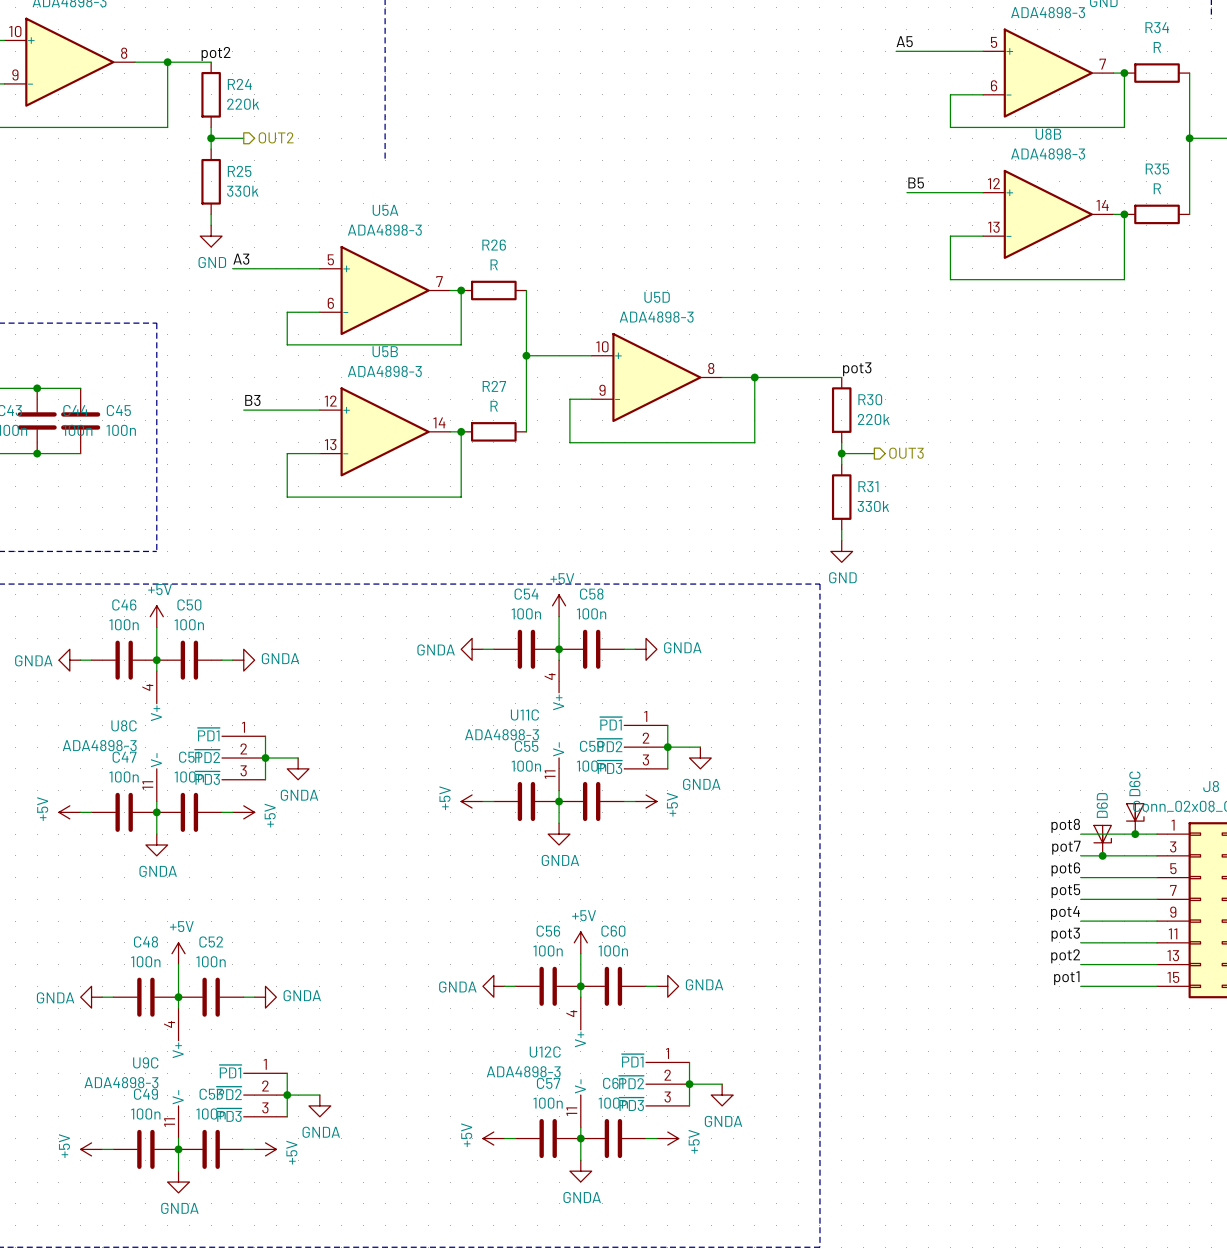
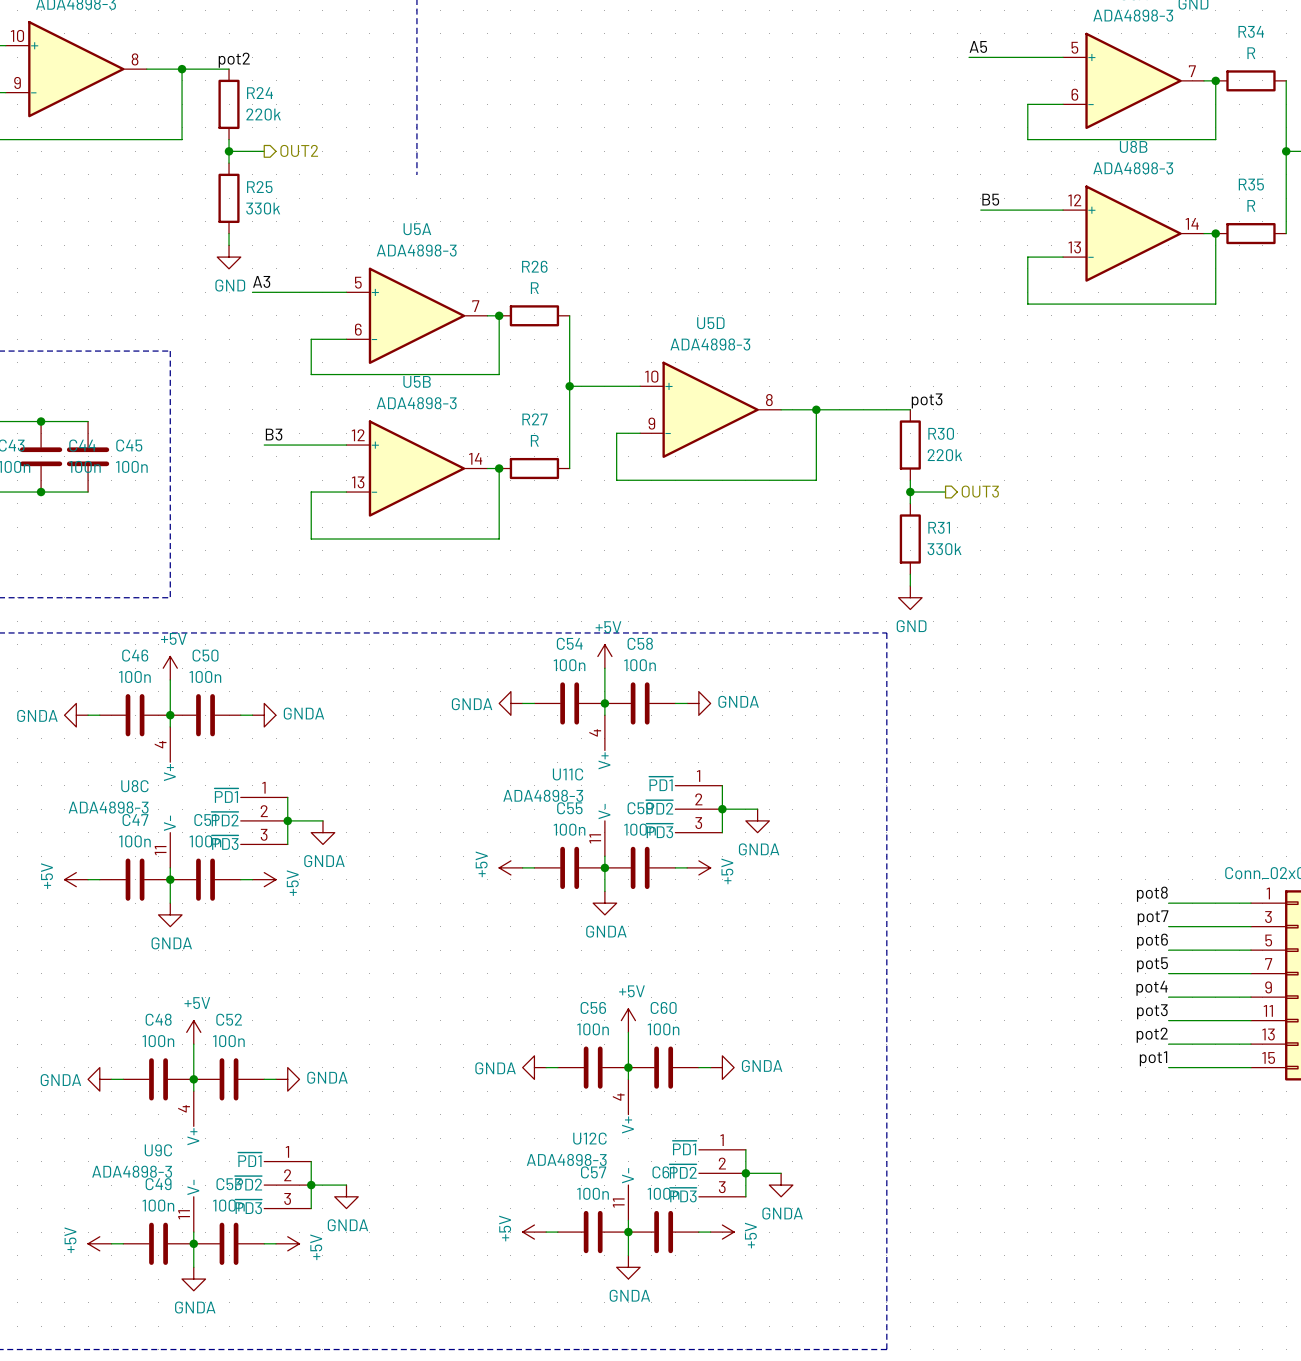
D6C: (1135, 818) -> none
junction: (1135, 834) -> none
D6D: (1102, 840) -> none
junction: (1102, 855) -> none

